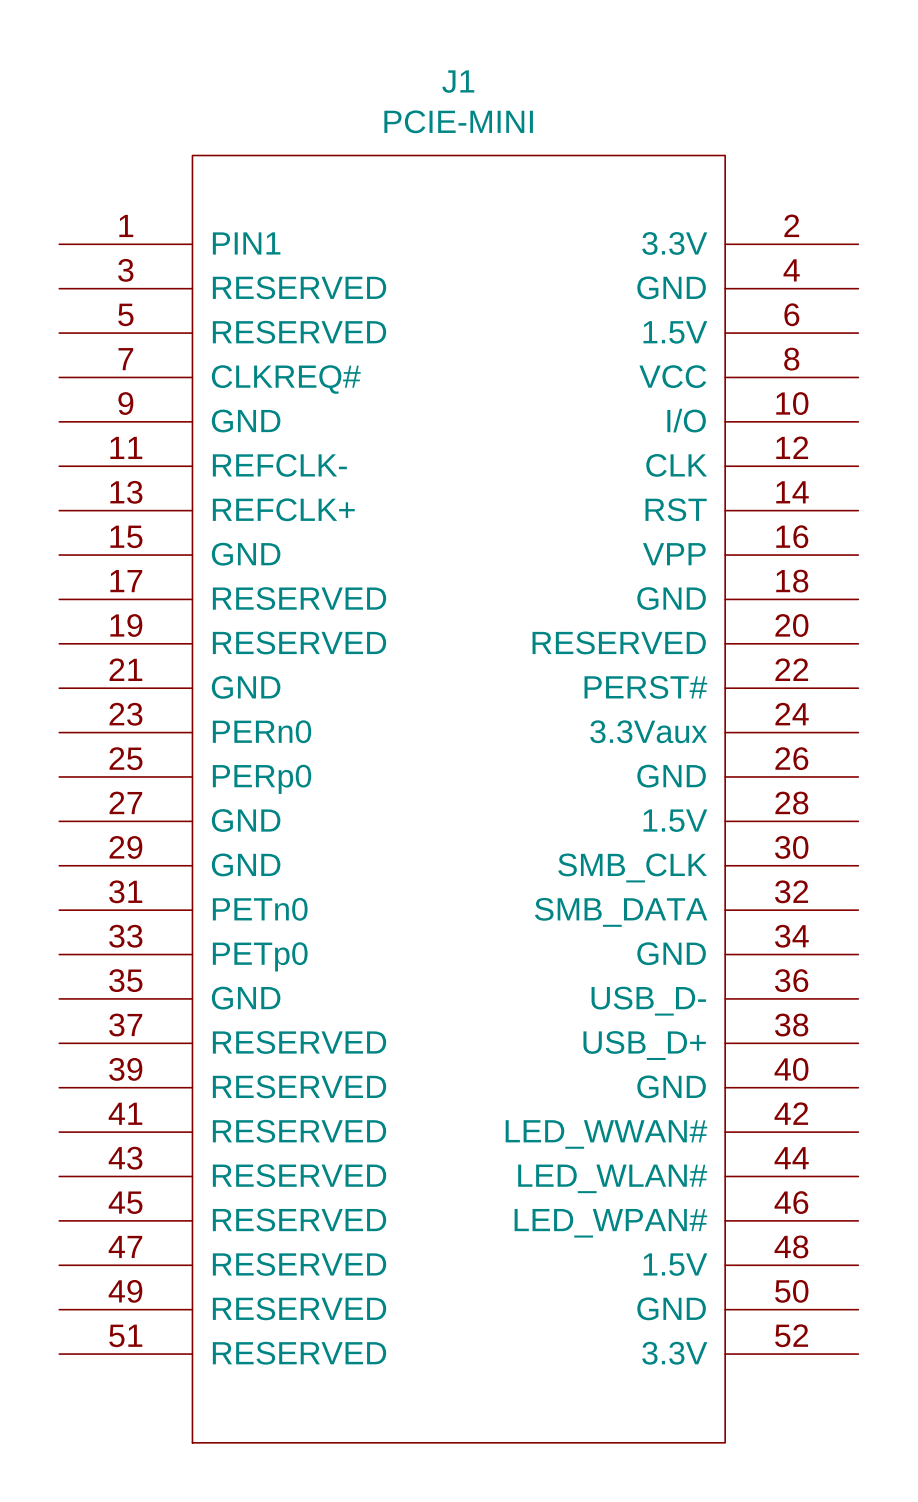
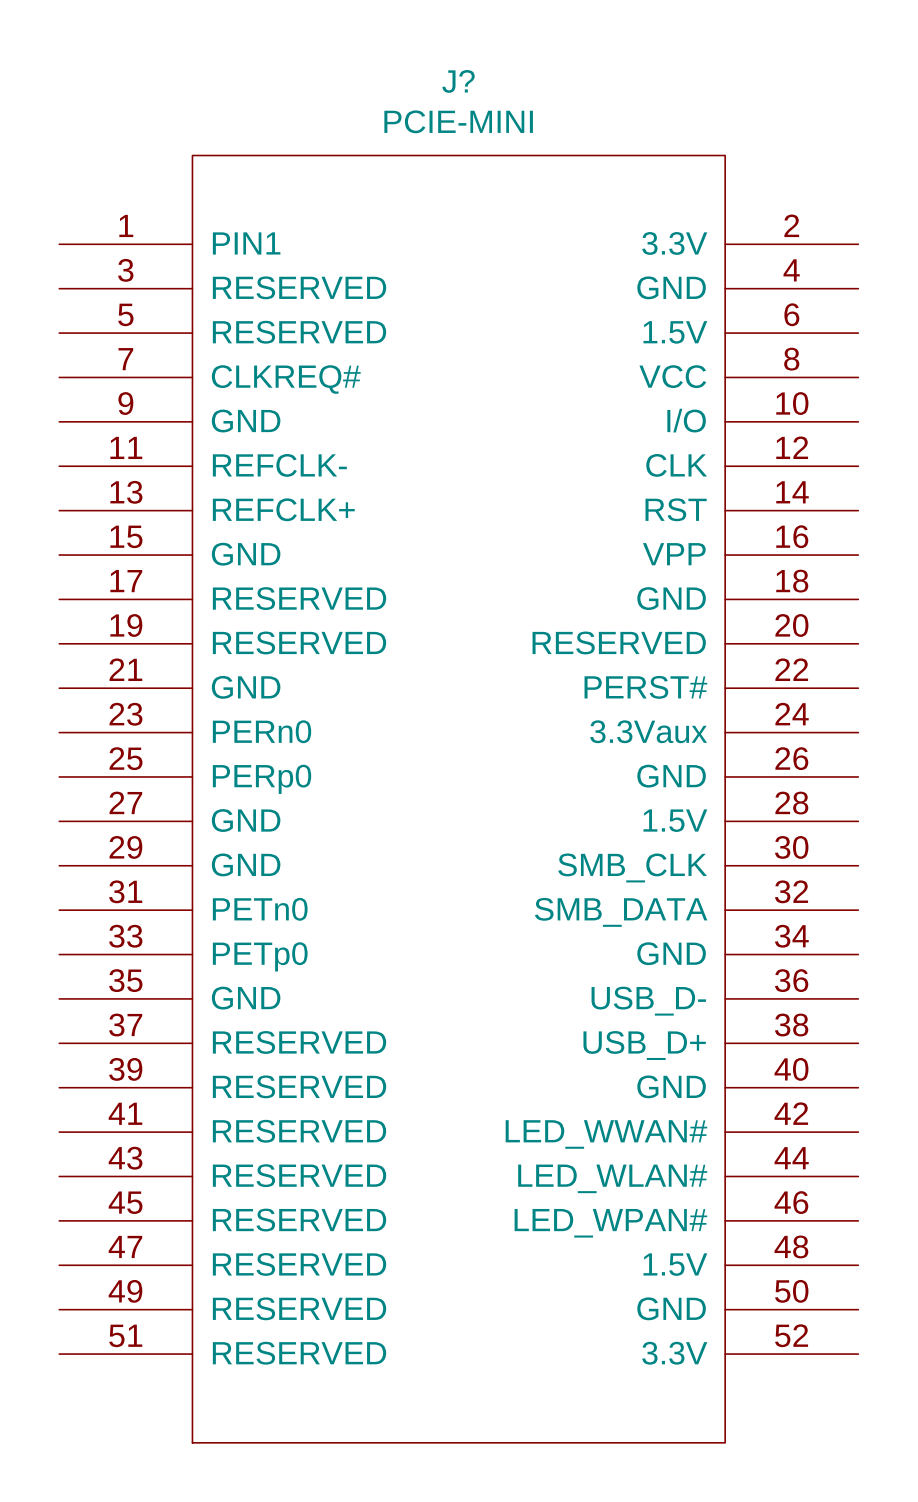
J1 name: J1 (458, 81) -> J? (458, 81)

